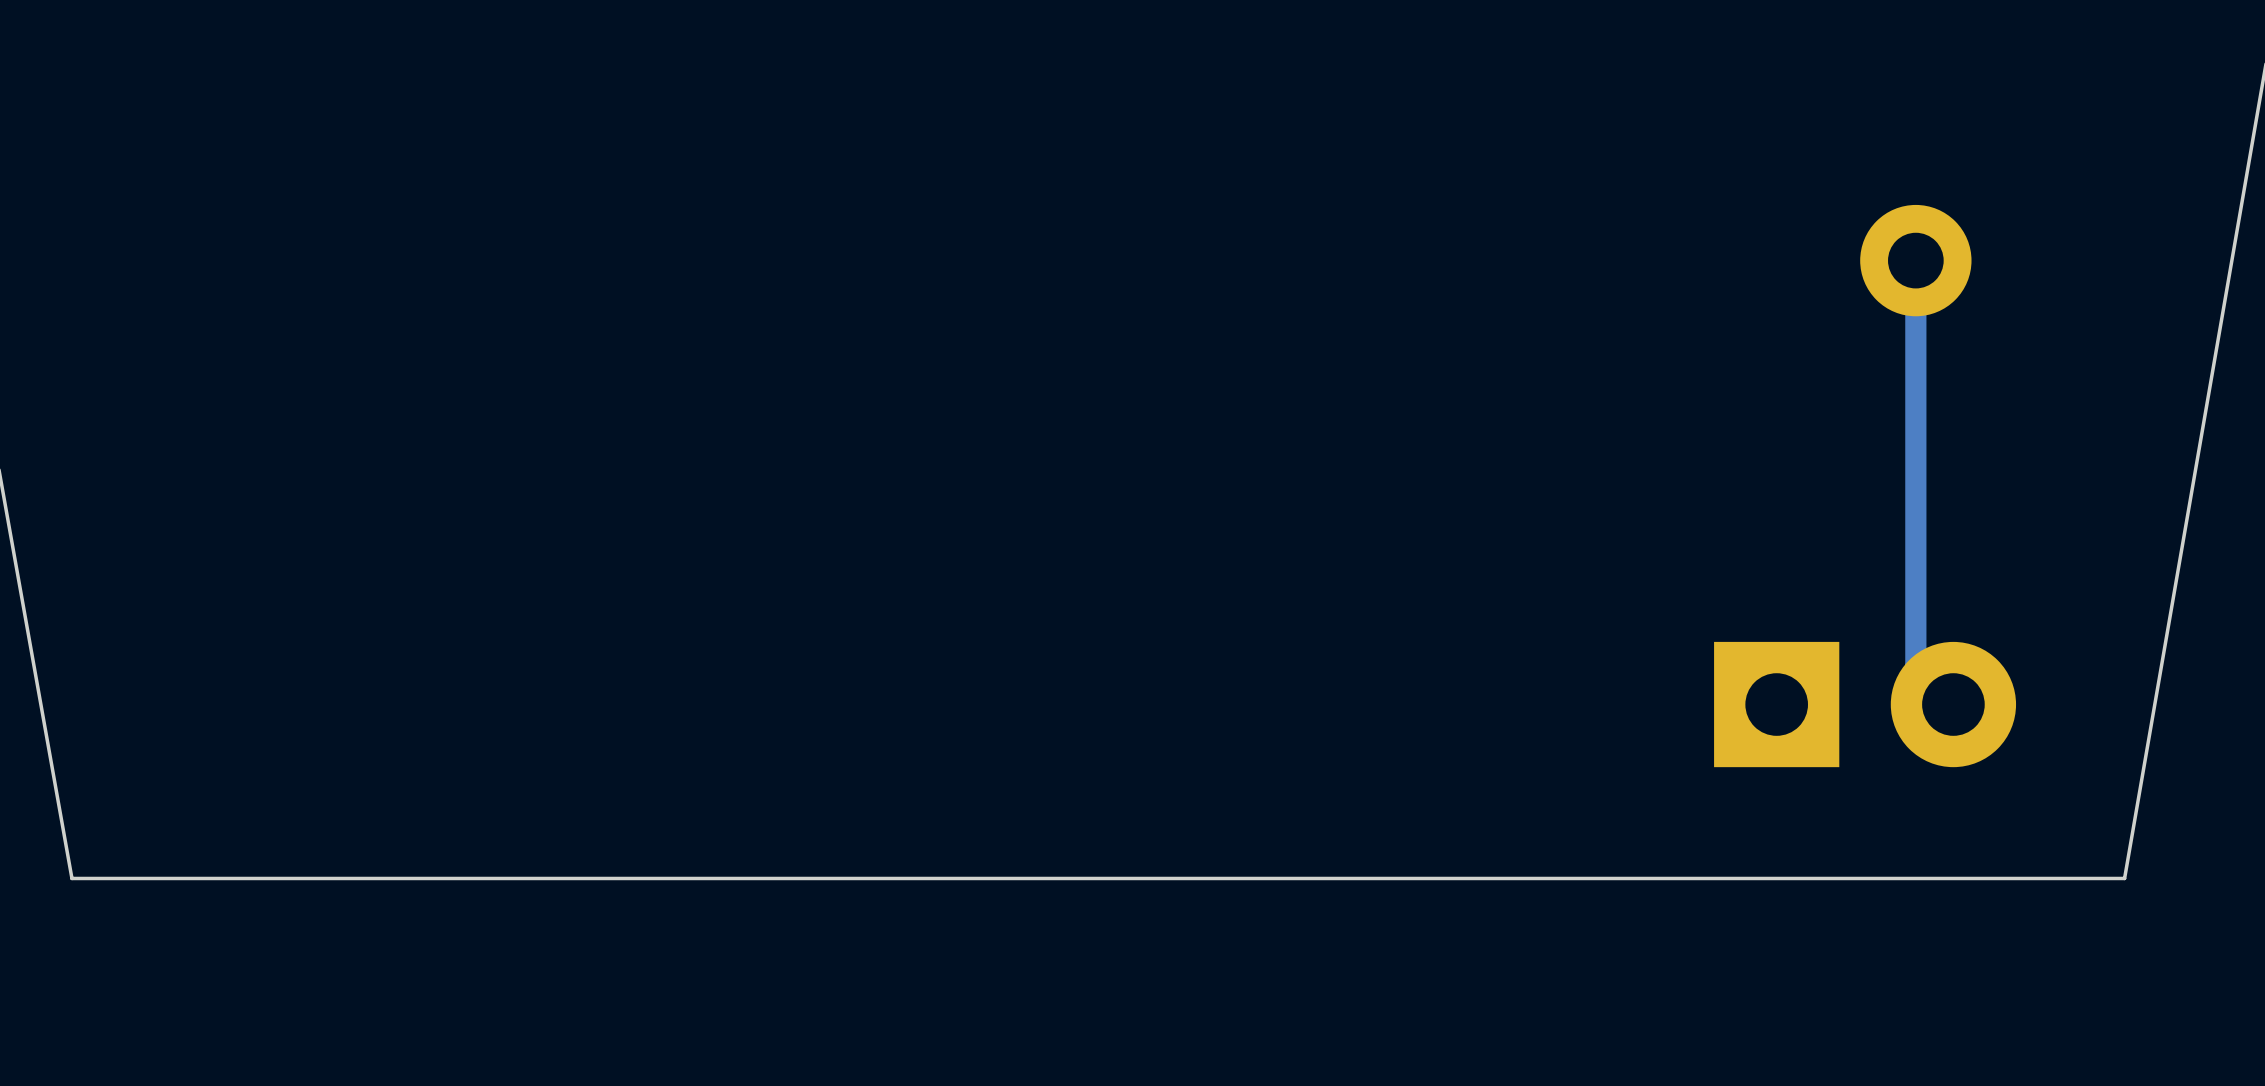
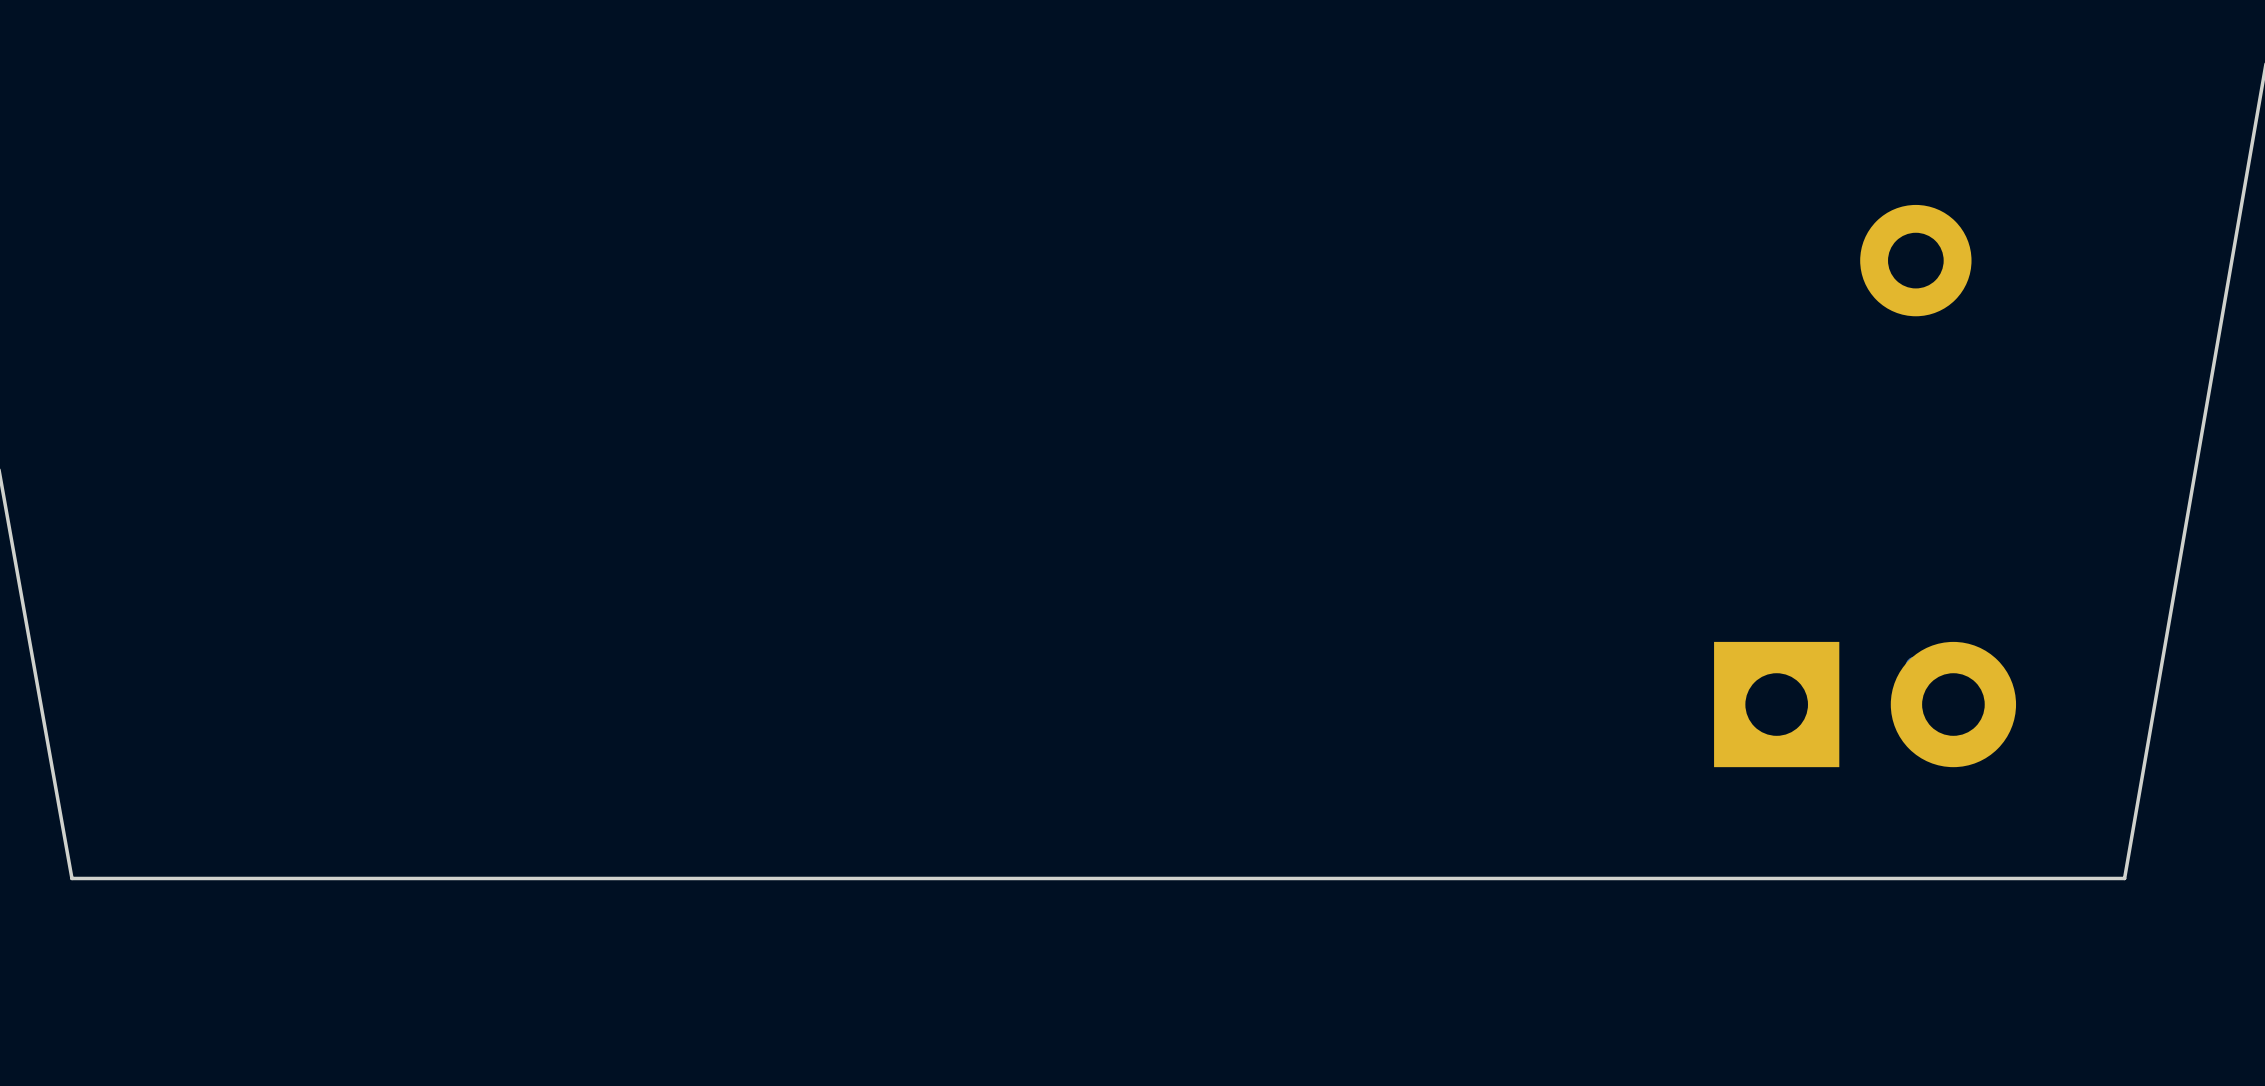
track: (1915, 260) (1915, 666) -> none

